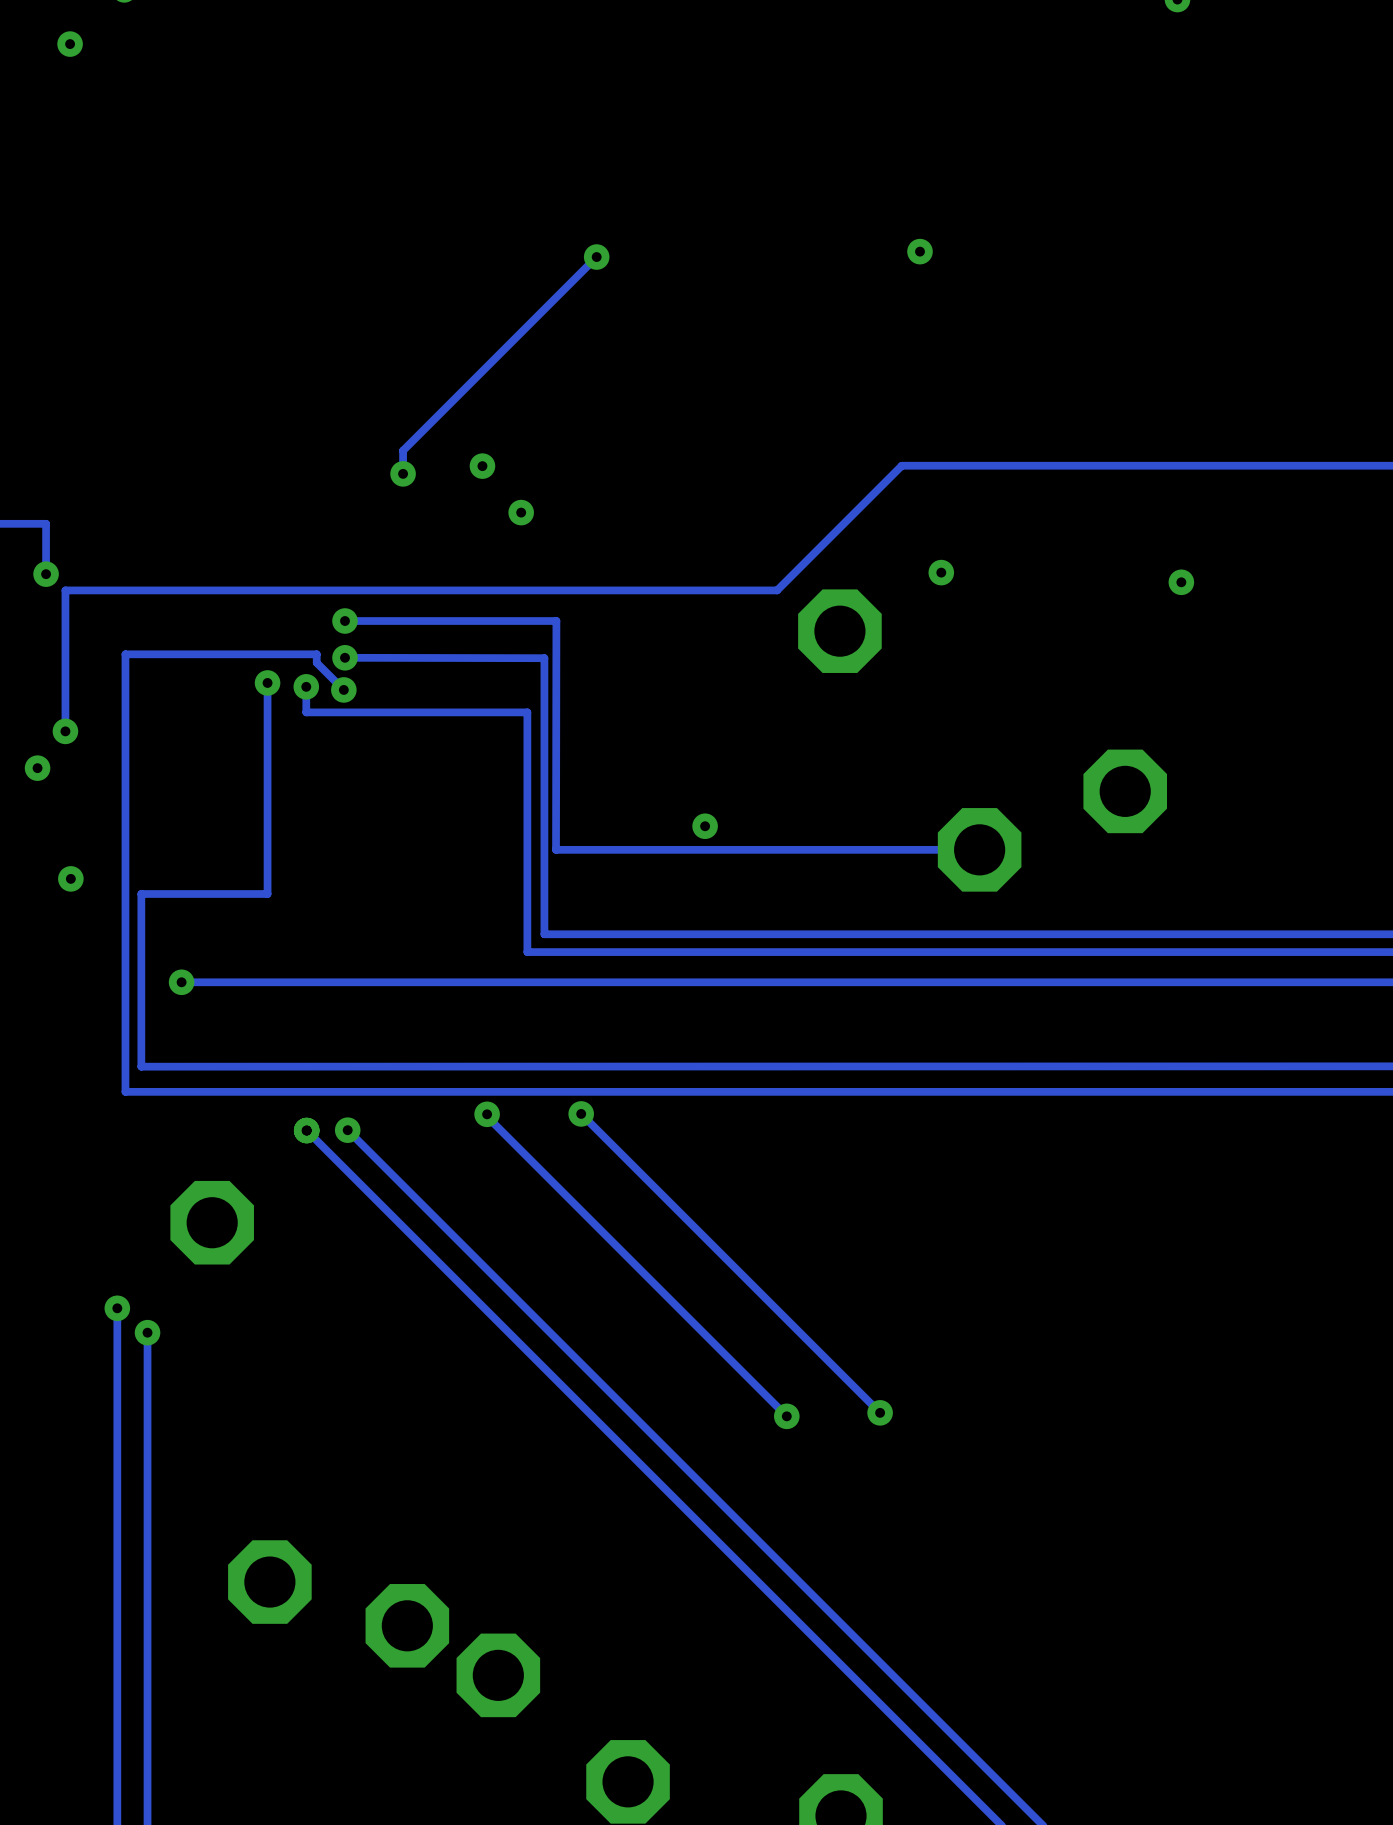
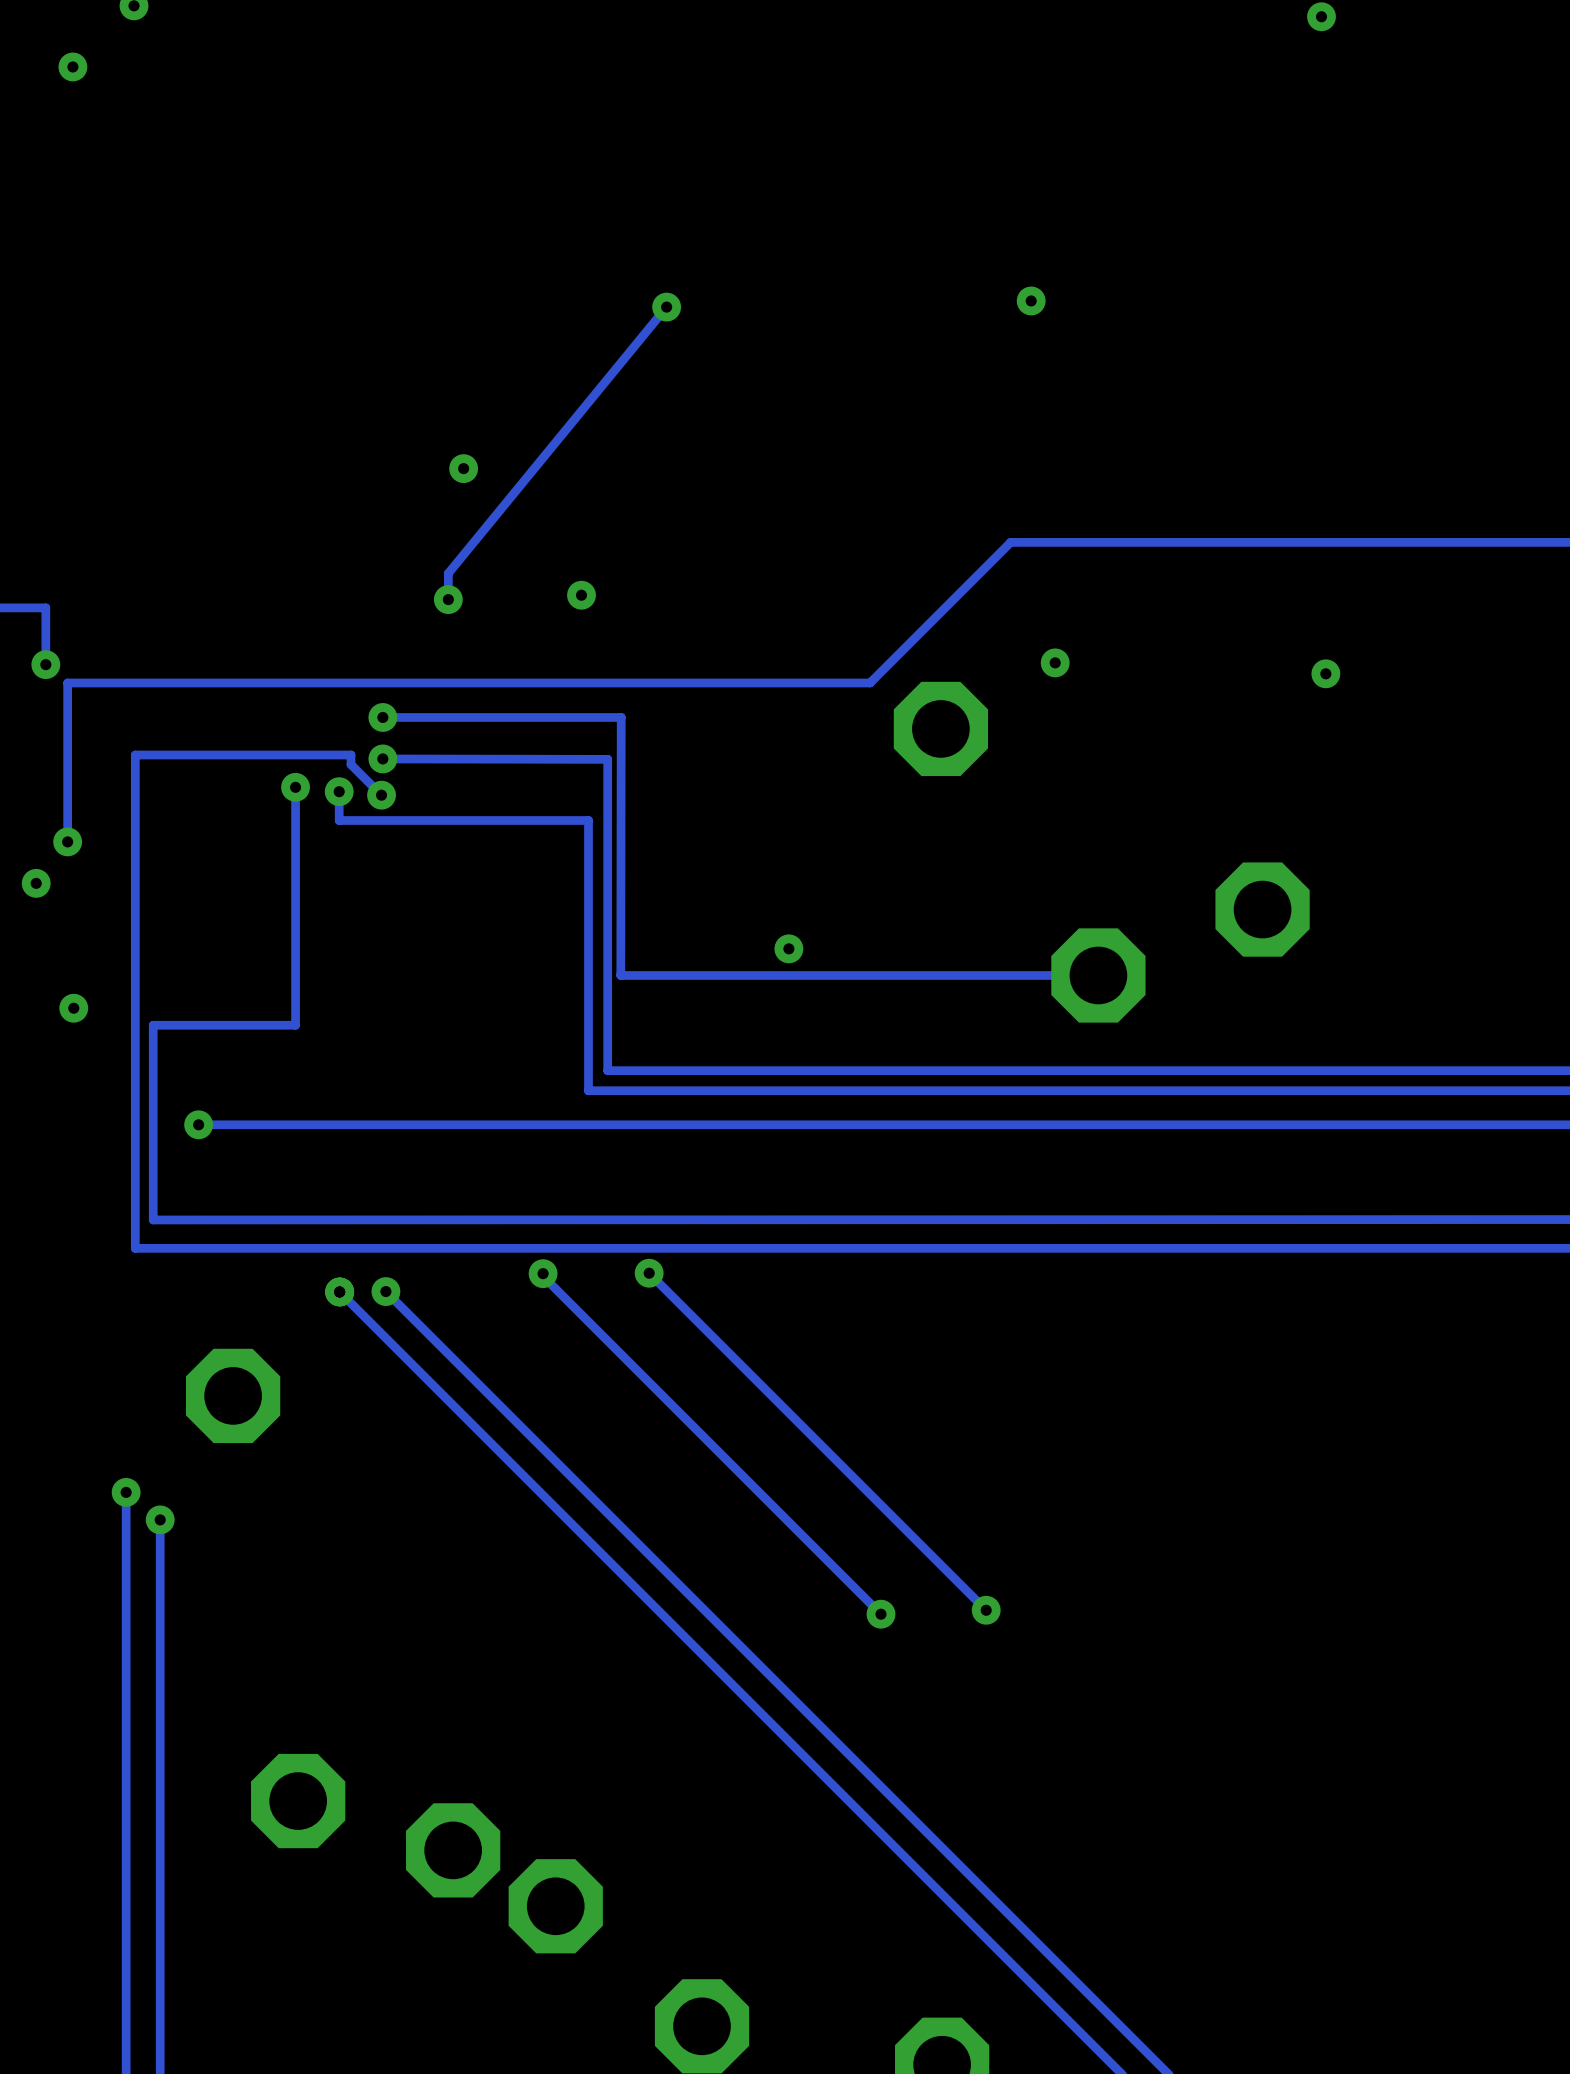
track: (596, 257) (403, 450) (403, 473) -> (666, 307) (448, 573) (448, 599)
via: none -> (463, 468)
via: (482, 466) -> none
via: (403, 473) -> none
via: none -> (448, 599)

